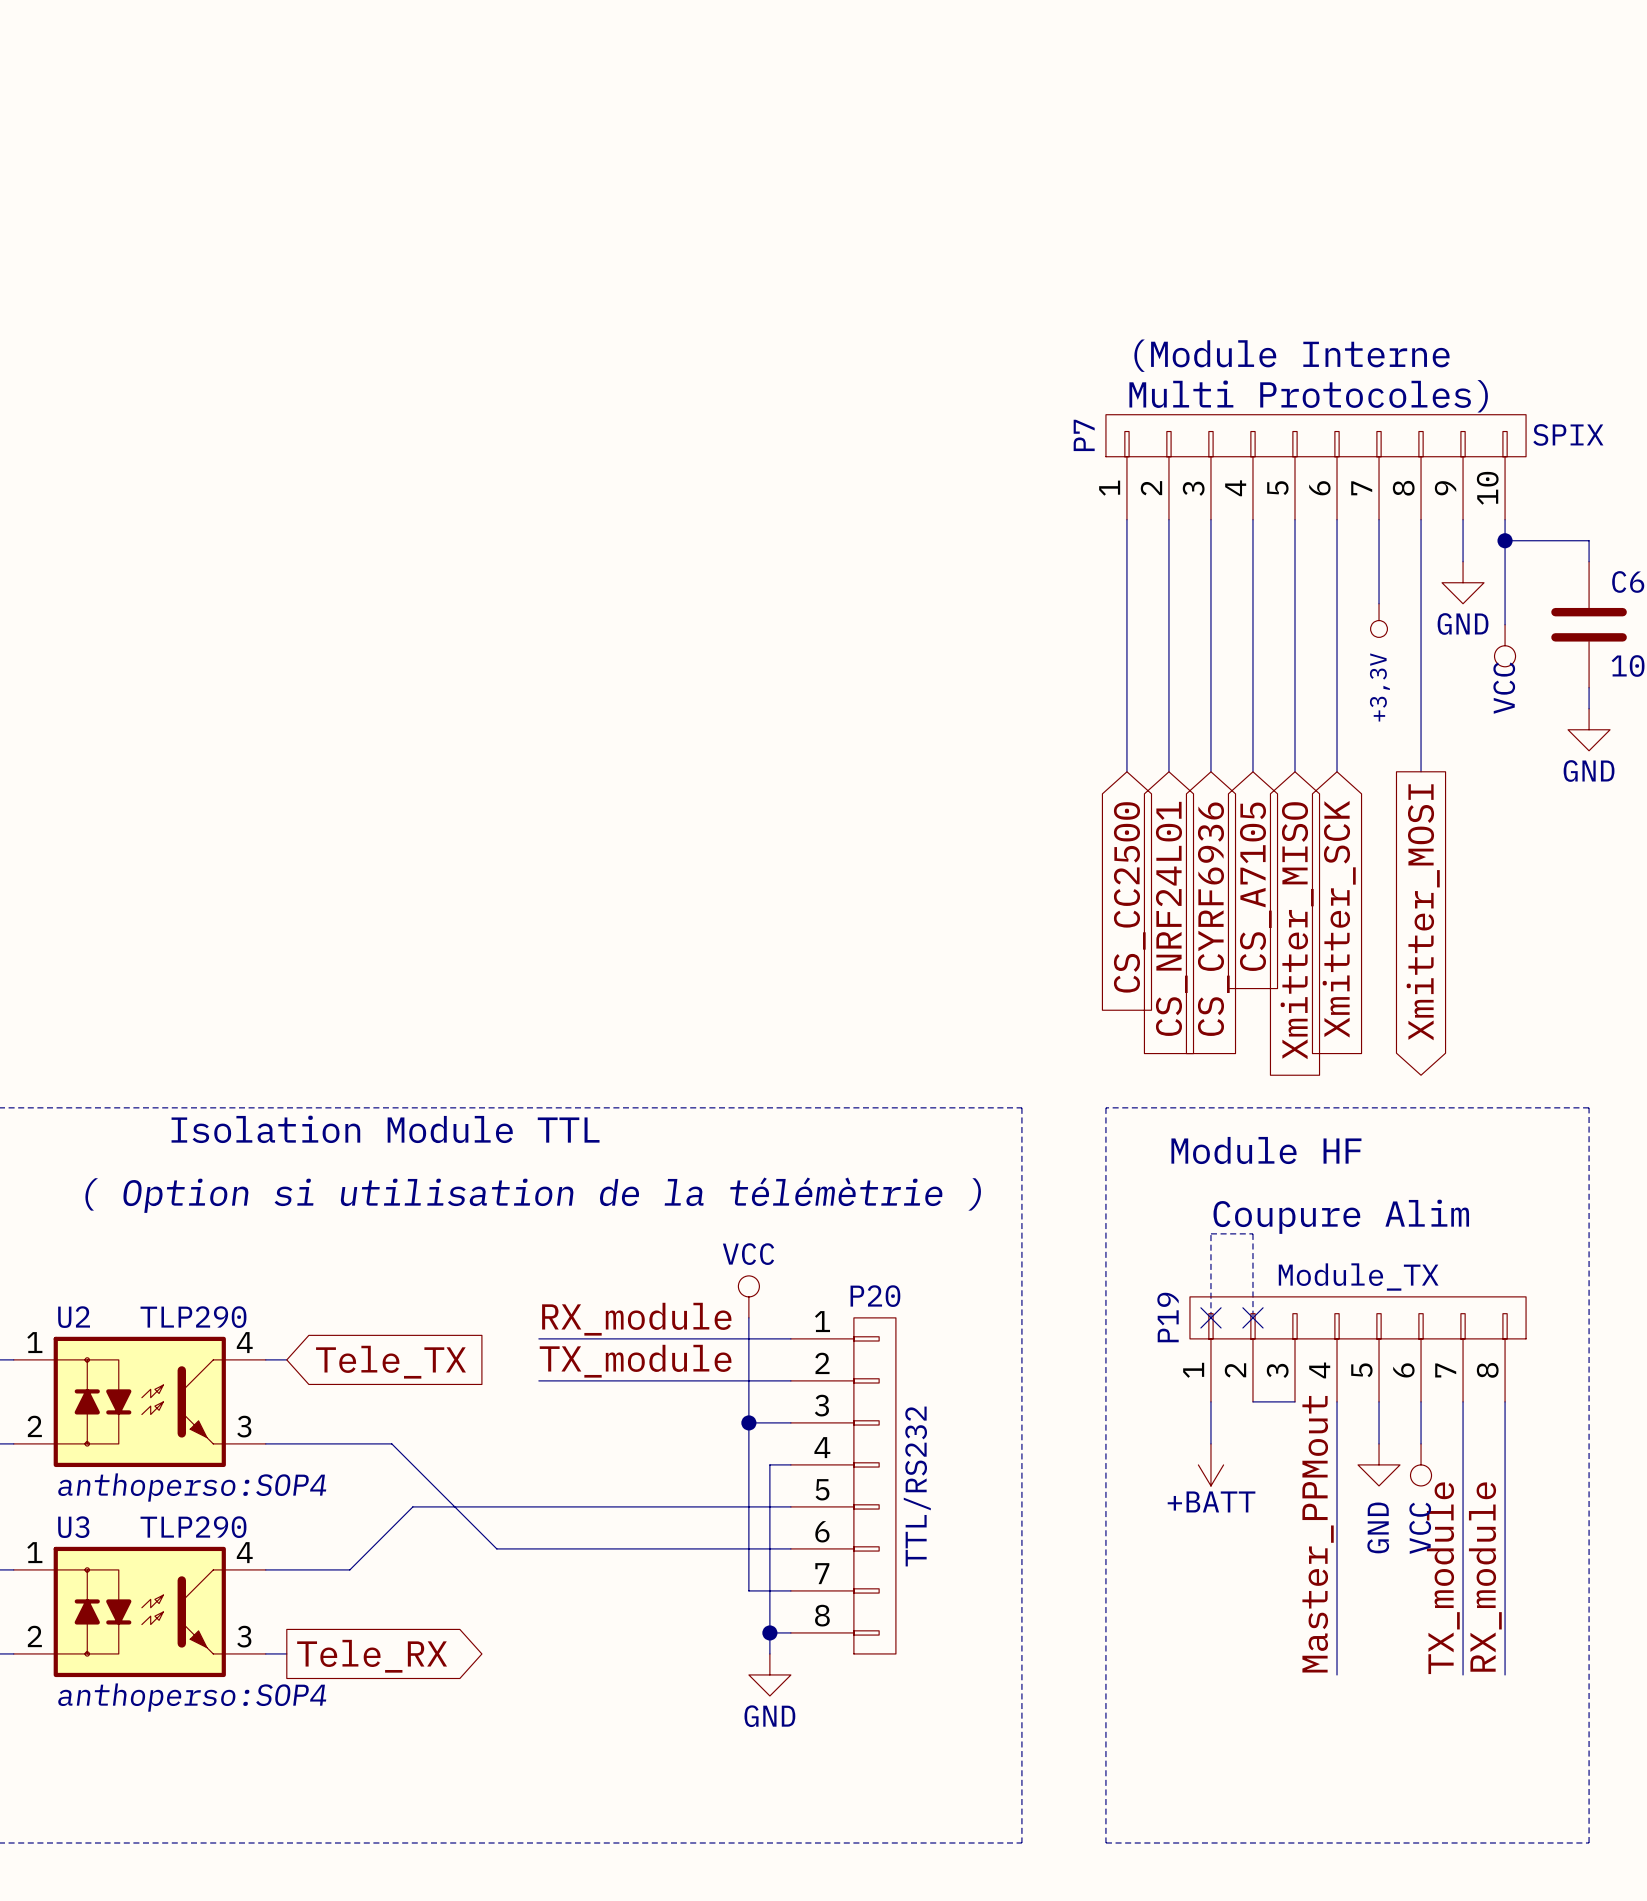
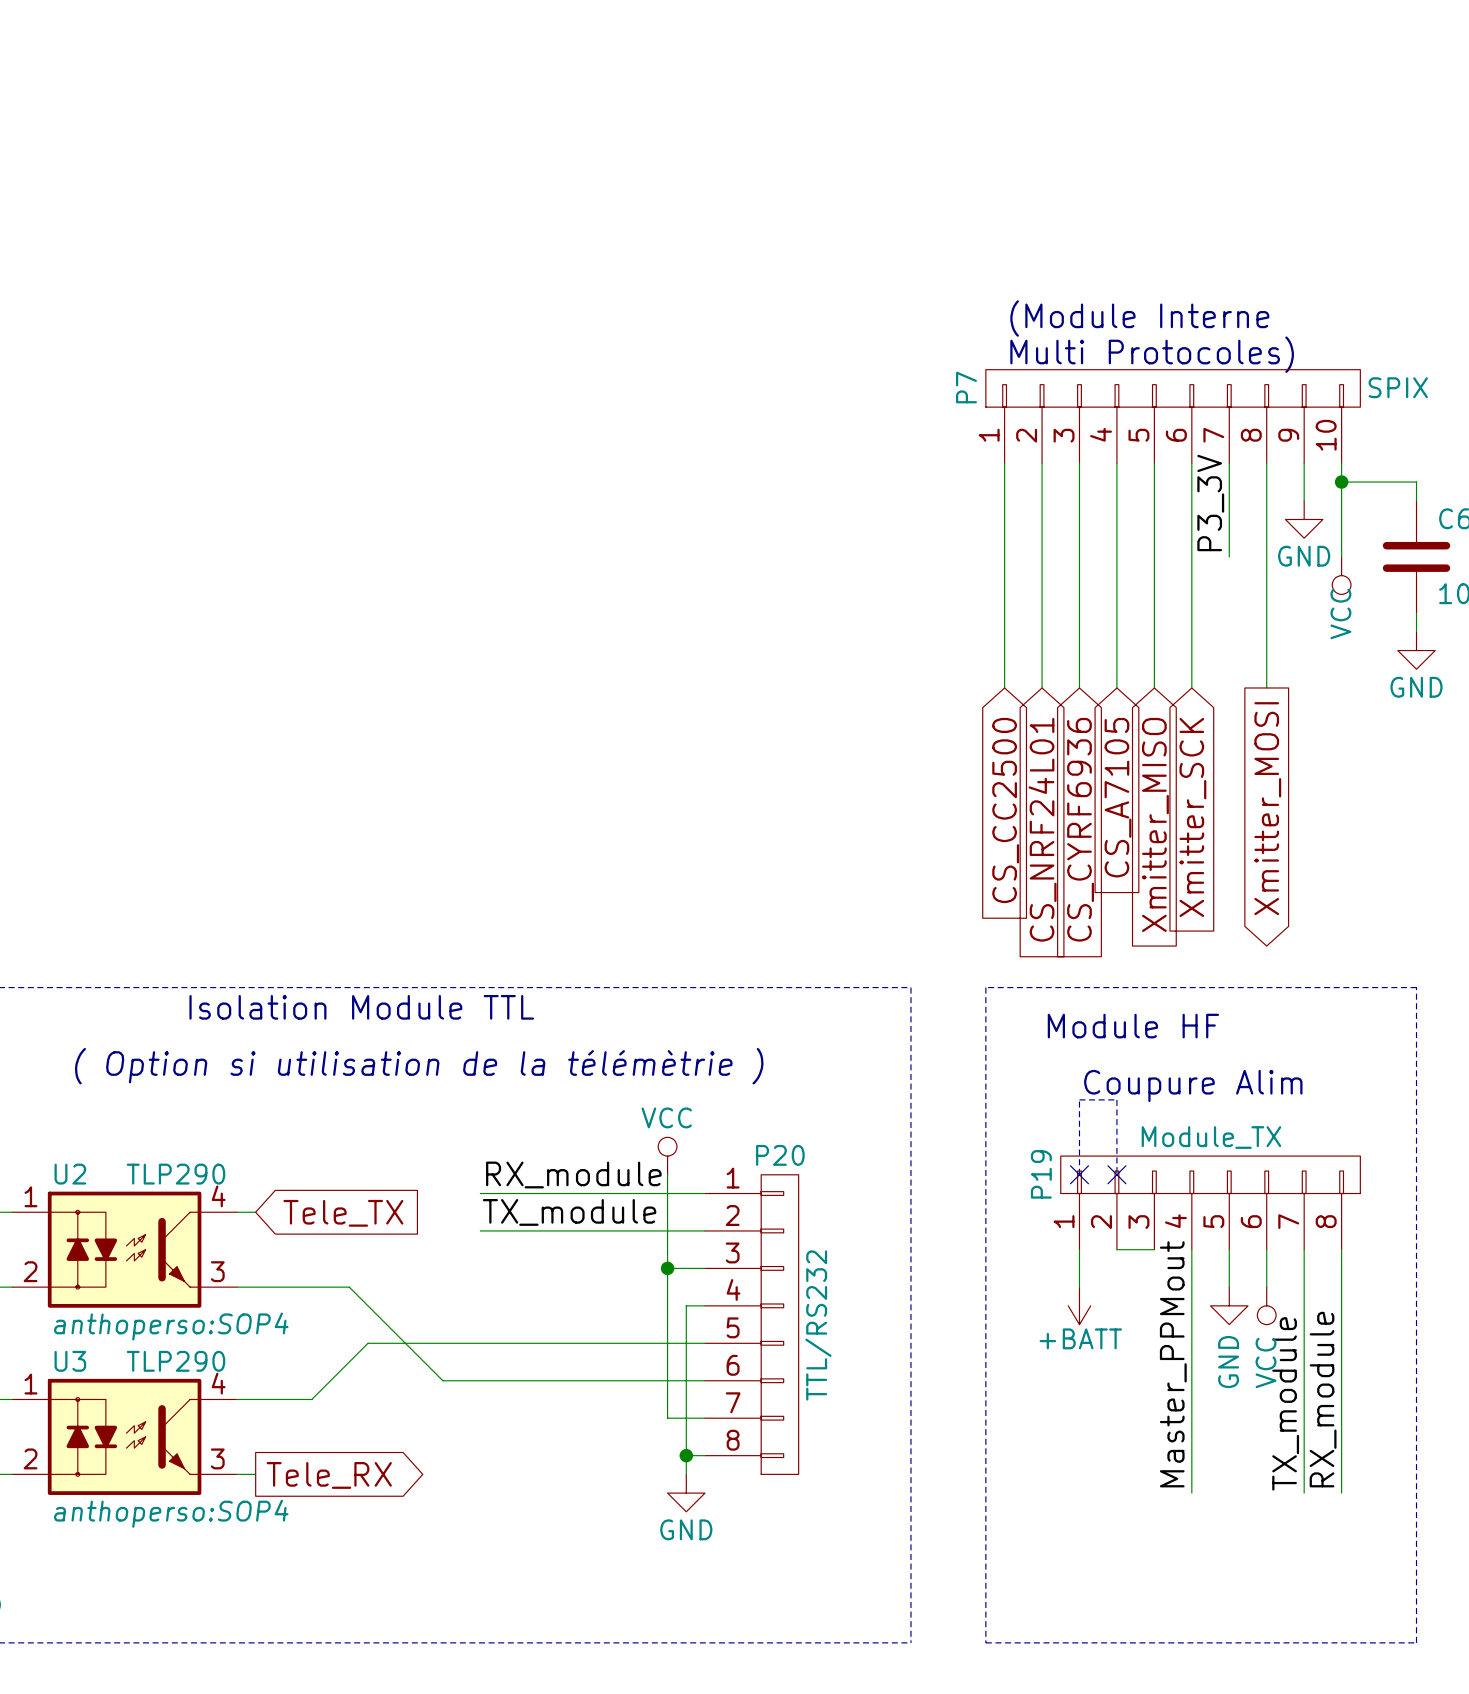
label: none -> P3_3V (1210, 503)
power symbol: +3,3V (1379, 620) -> none

